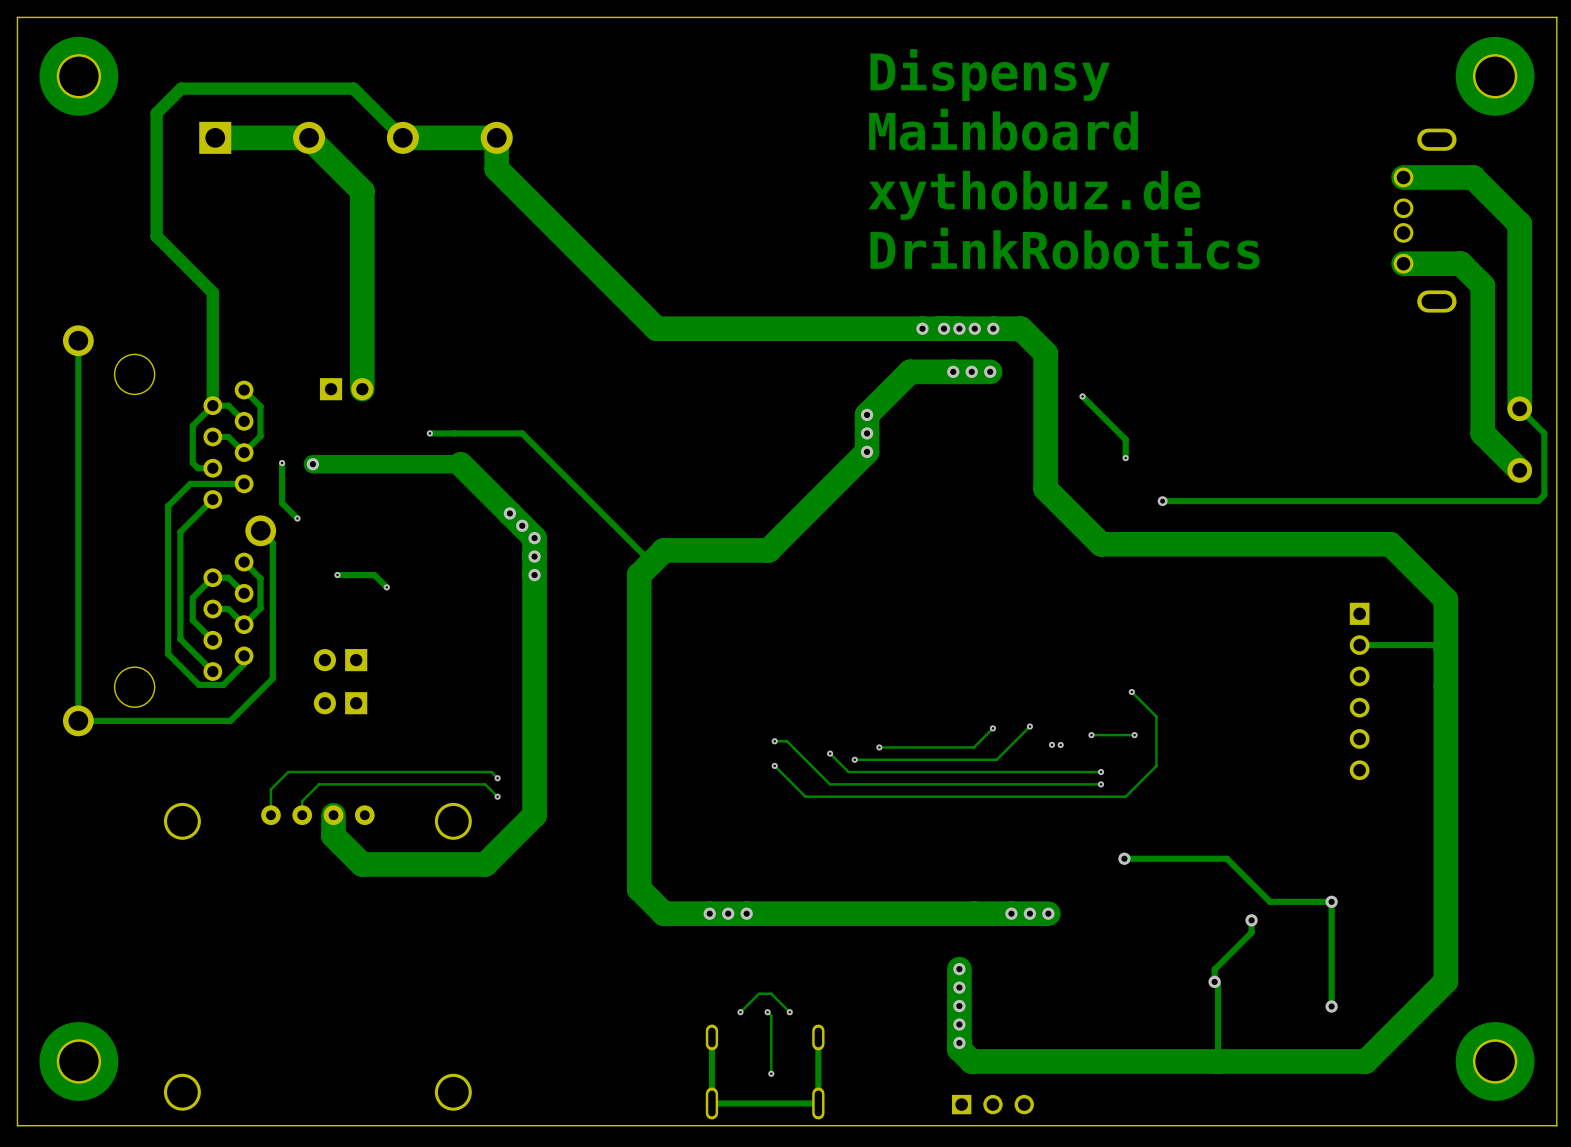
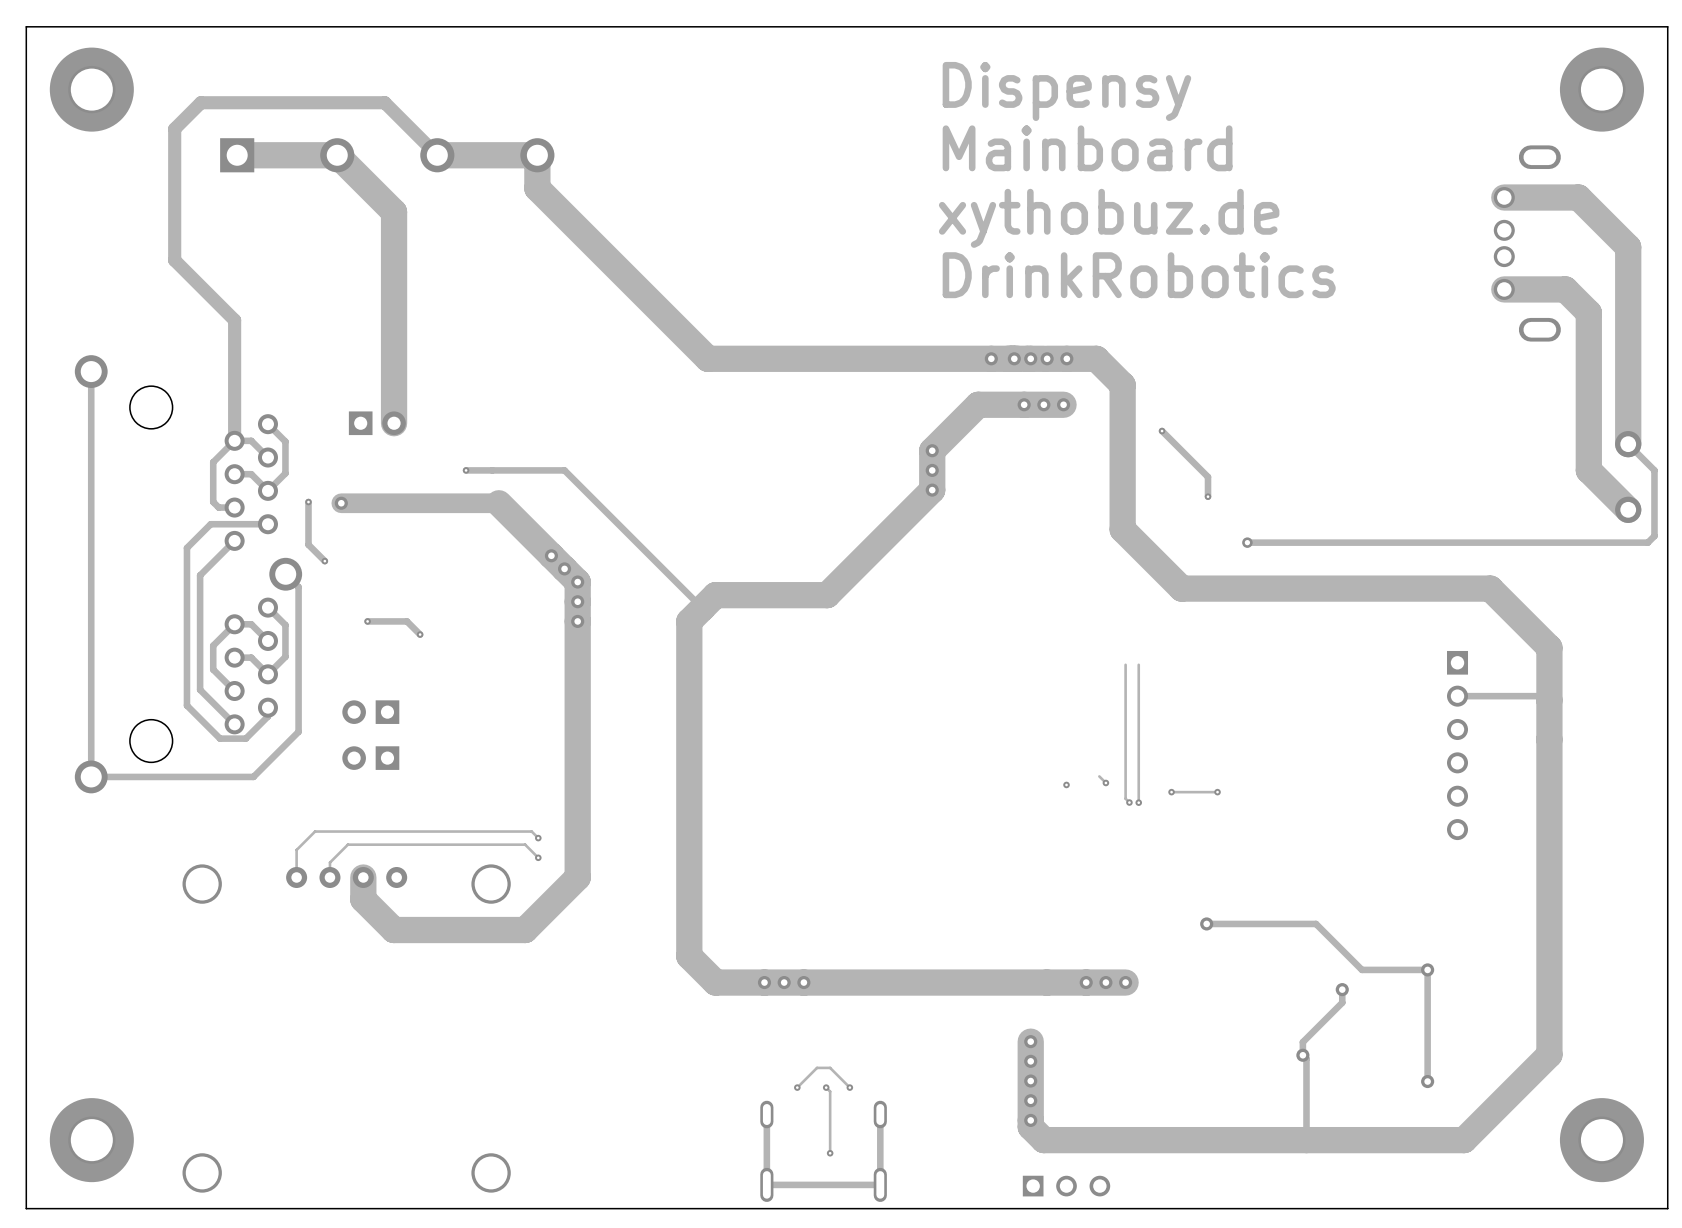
track: none -> (1125, 664) (1125, 798) (1129, 802)
track: none -> (1138, 664) (1138, 802)
track: (1131, 692) (1156, 716) (1156, 765) (1125, 796) (805, 796) (774, 765) -> none
via: (1131, 692) -> none
track: (1029, 726) (996, 759) (854, 759) -> (1105, 782) (1099, 776)
track: (992, 728) (973, 747) (879, 747) -> none
track: (774, 741) (787, 741) (830, 784) (1101, 784) -> none
via: (774, 741) -> none
via: (879, 747) -> none
track: (830, 753) (848, 772) (1101, 772) -> none
via: (830, 753) -> none
via: (854, 759) -> none
via: (774, 765) -> none
via: (1101, 772) -> none
via: (1101, 784) -> none

